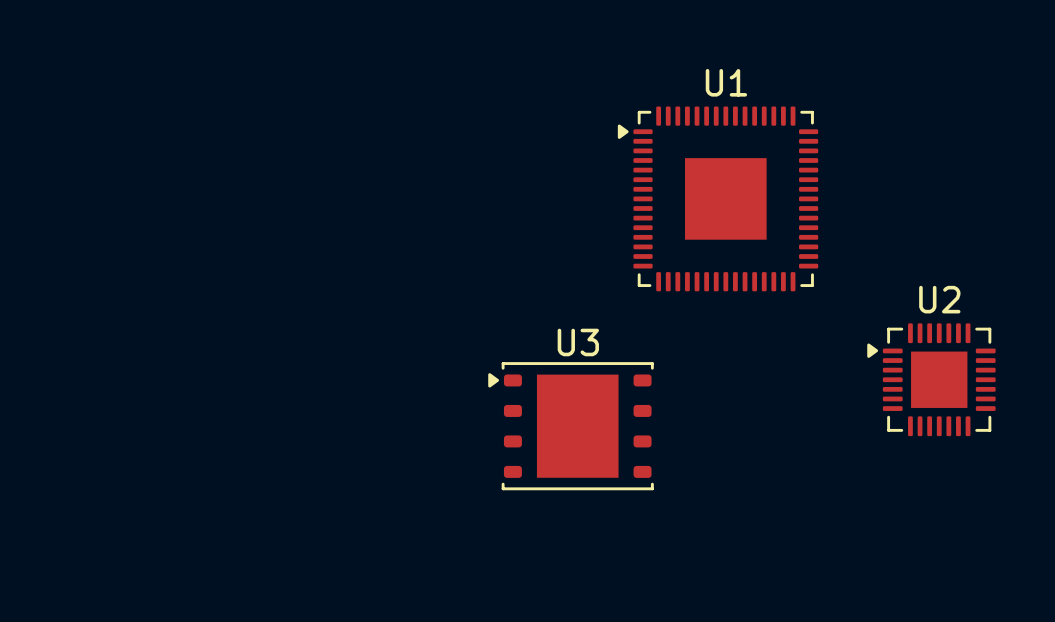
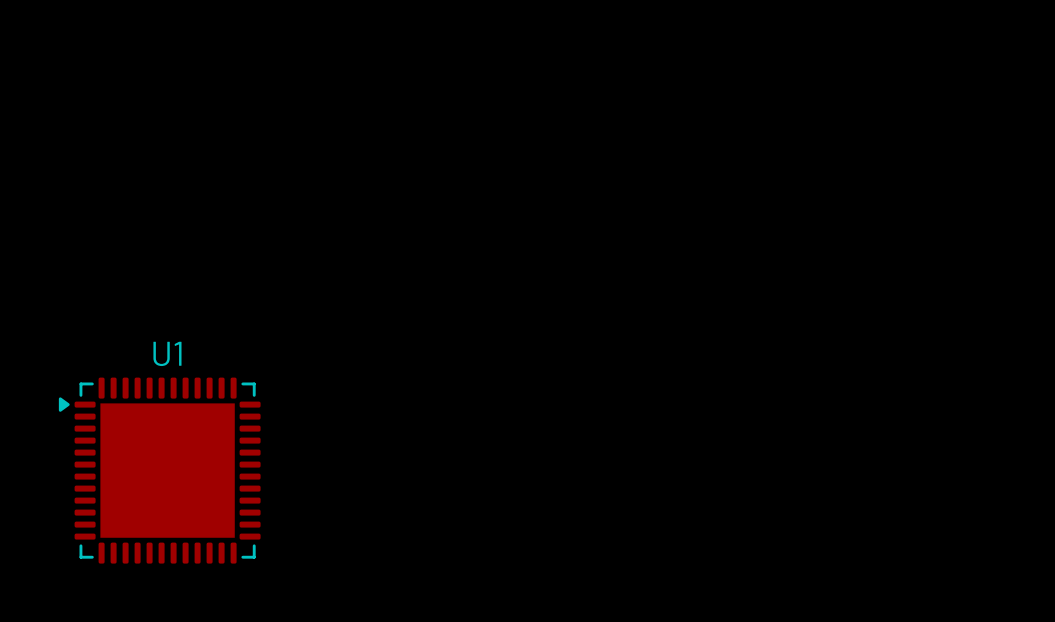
U1 footprint: [617, 106, 819, 292] -> [58, 377, 261, 564]
U2: (931, 379) -> none
U3: (571, 426) -> none

